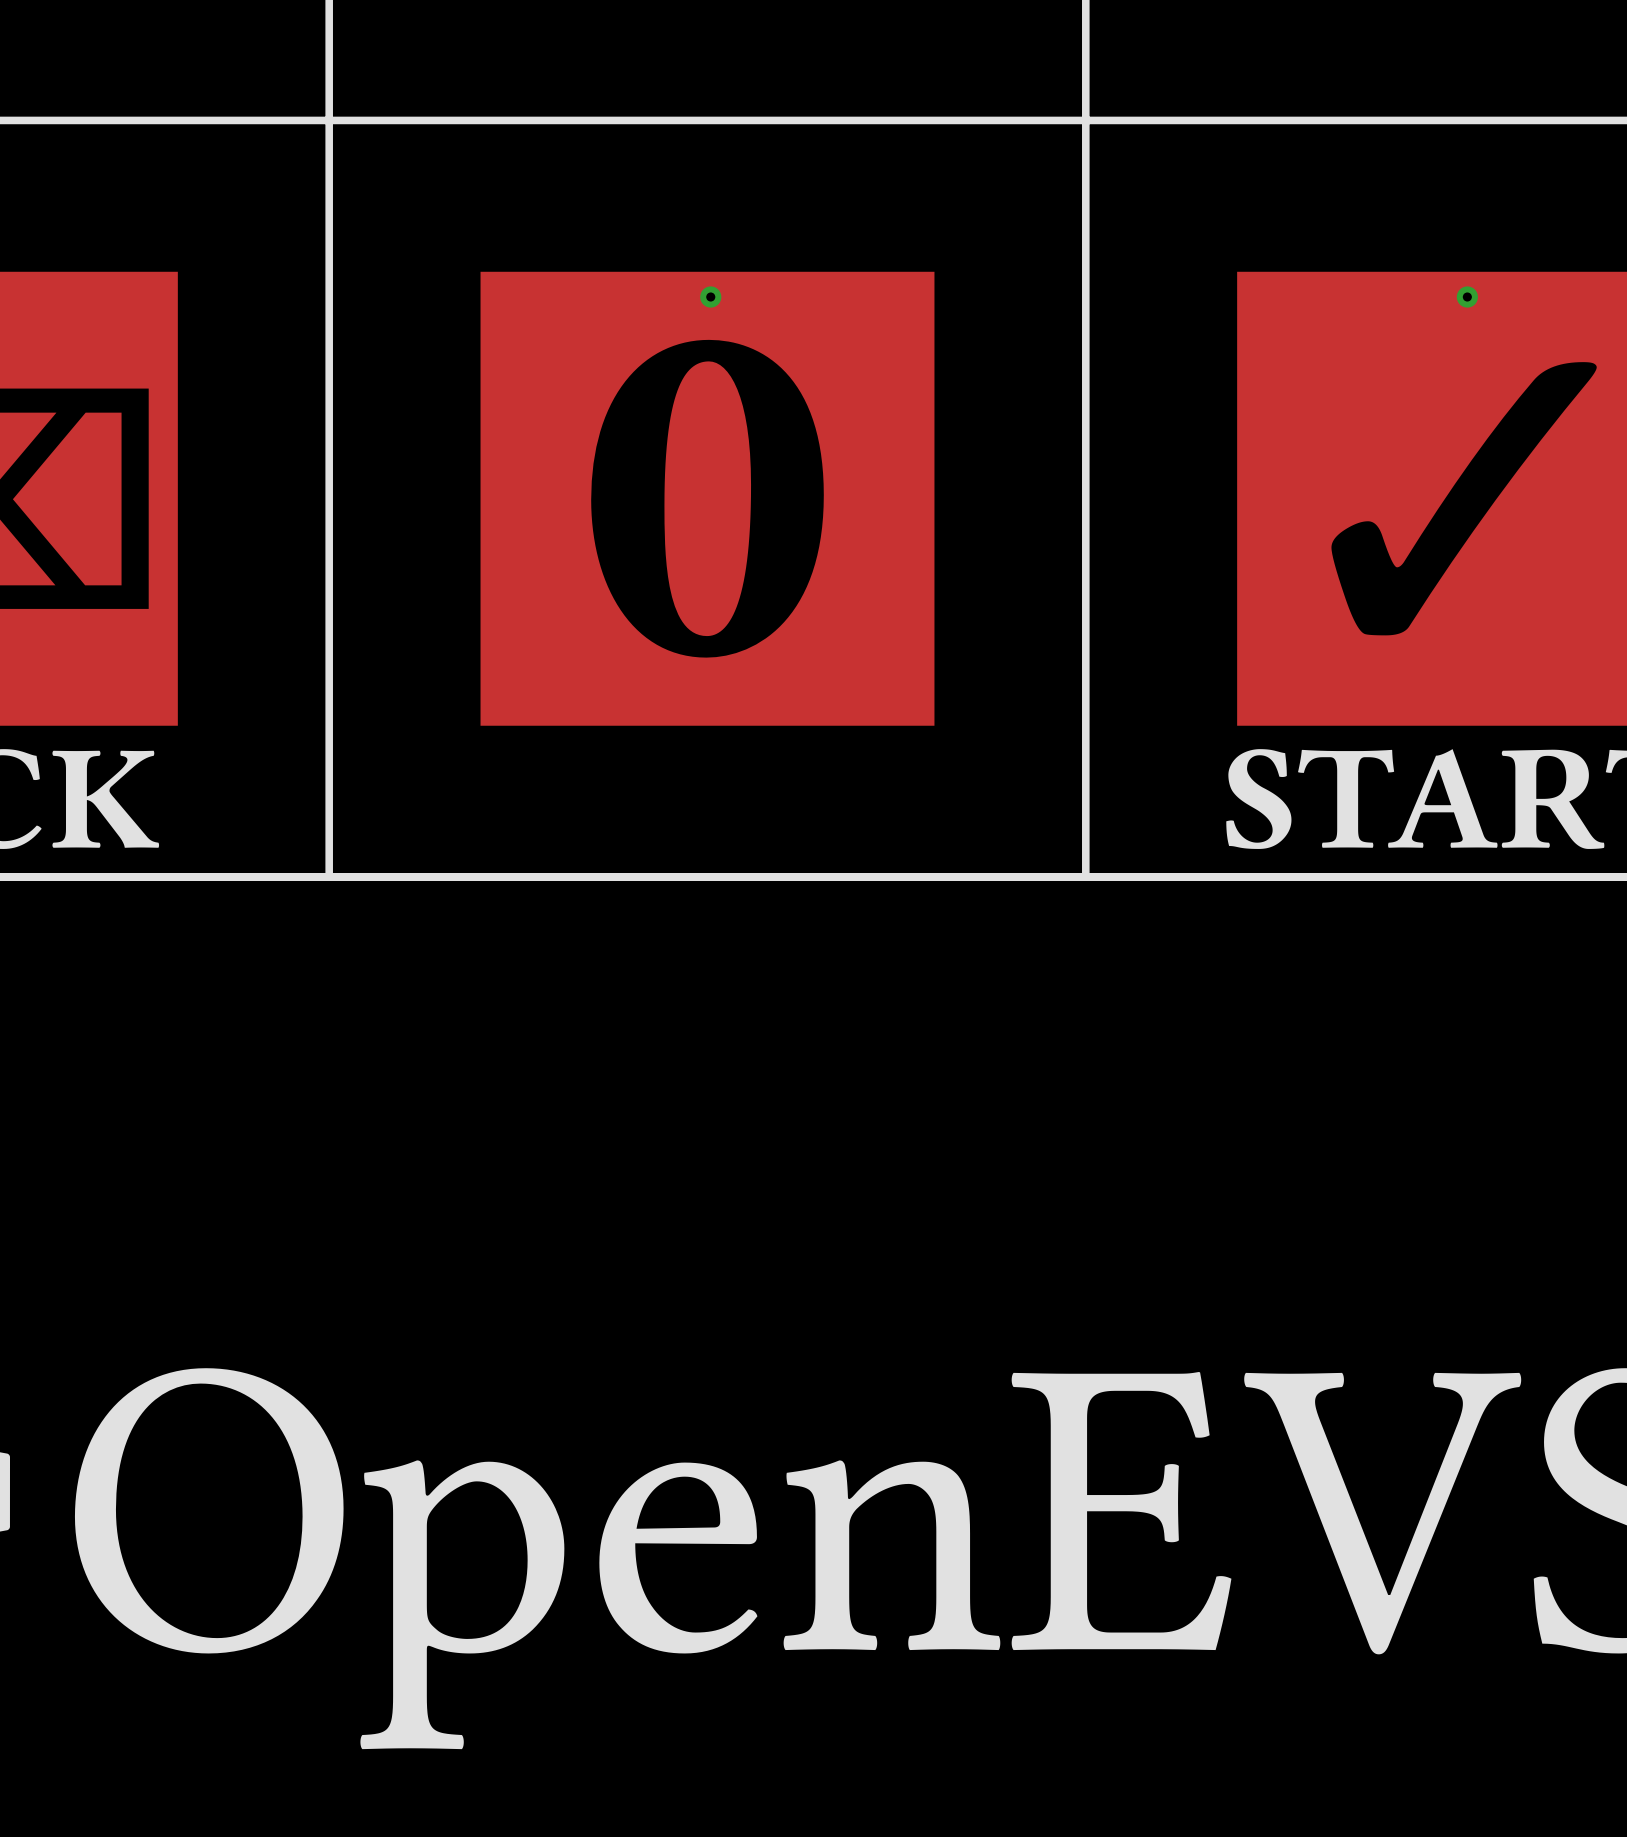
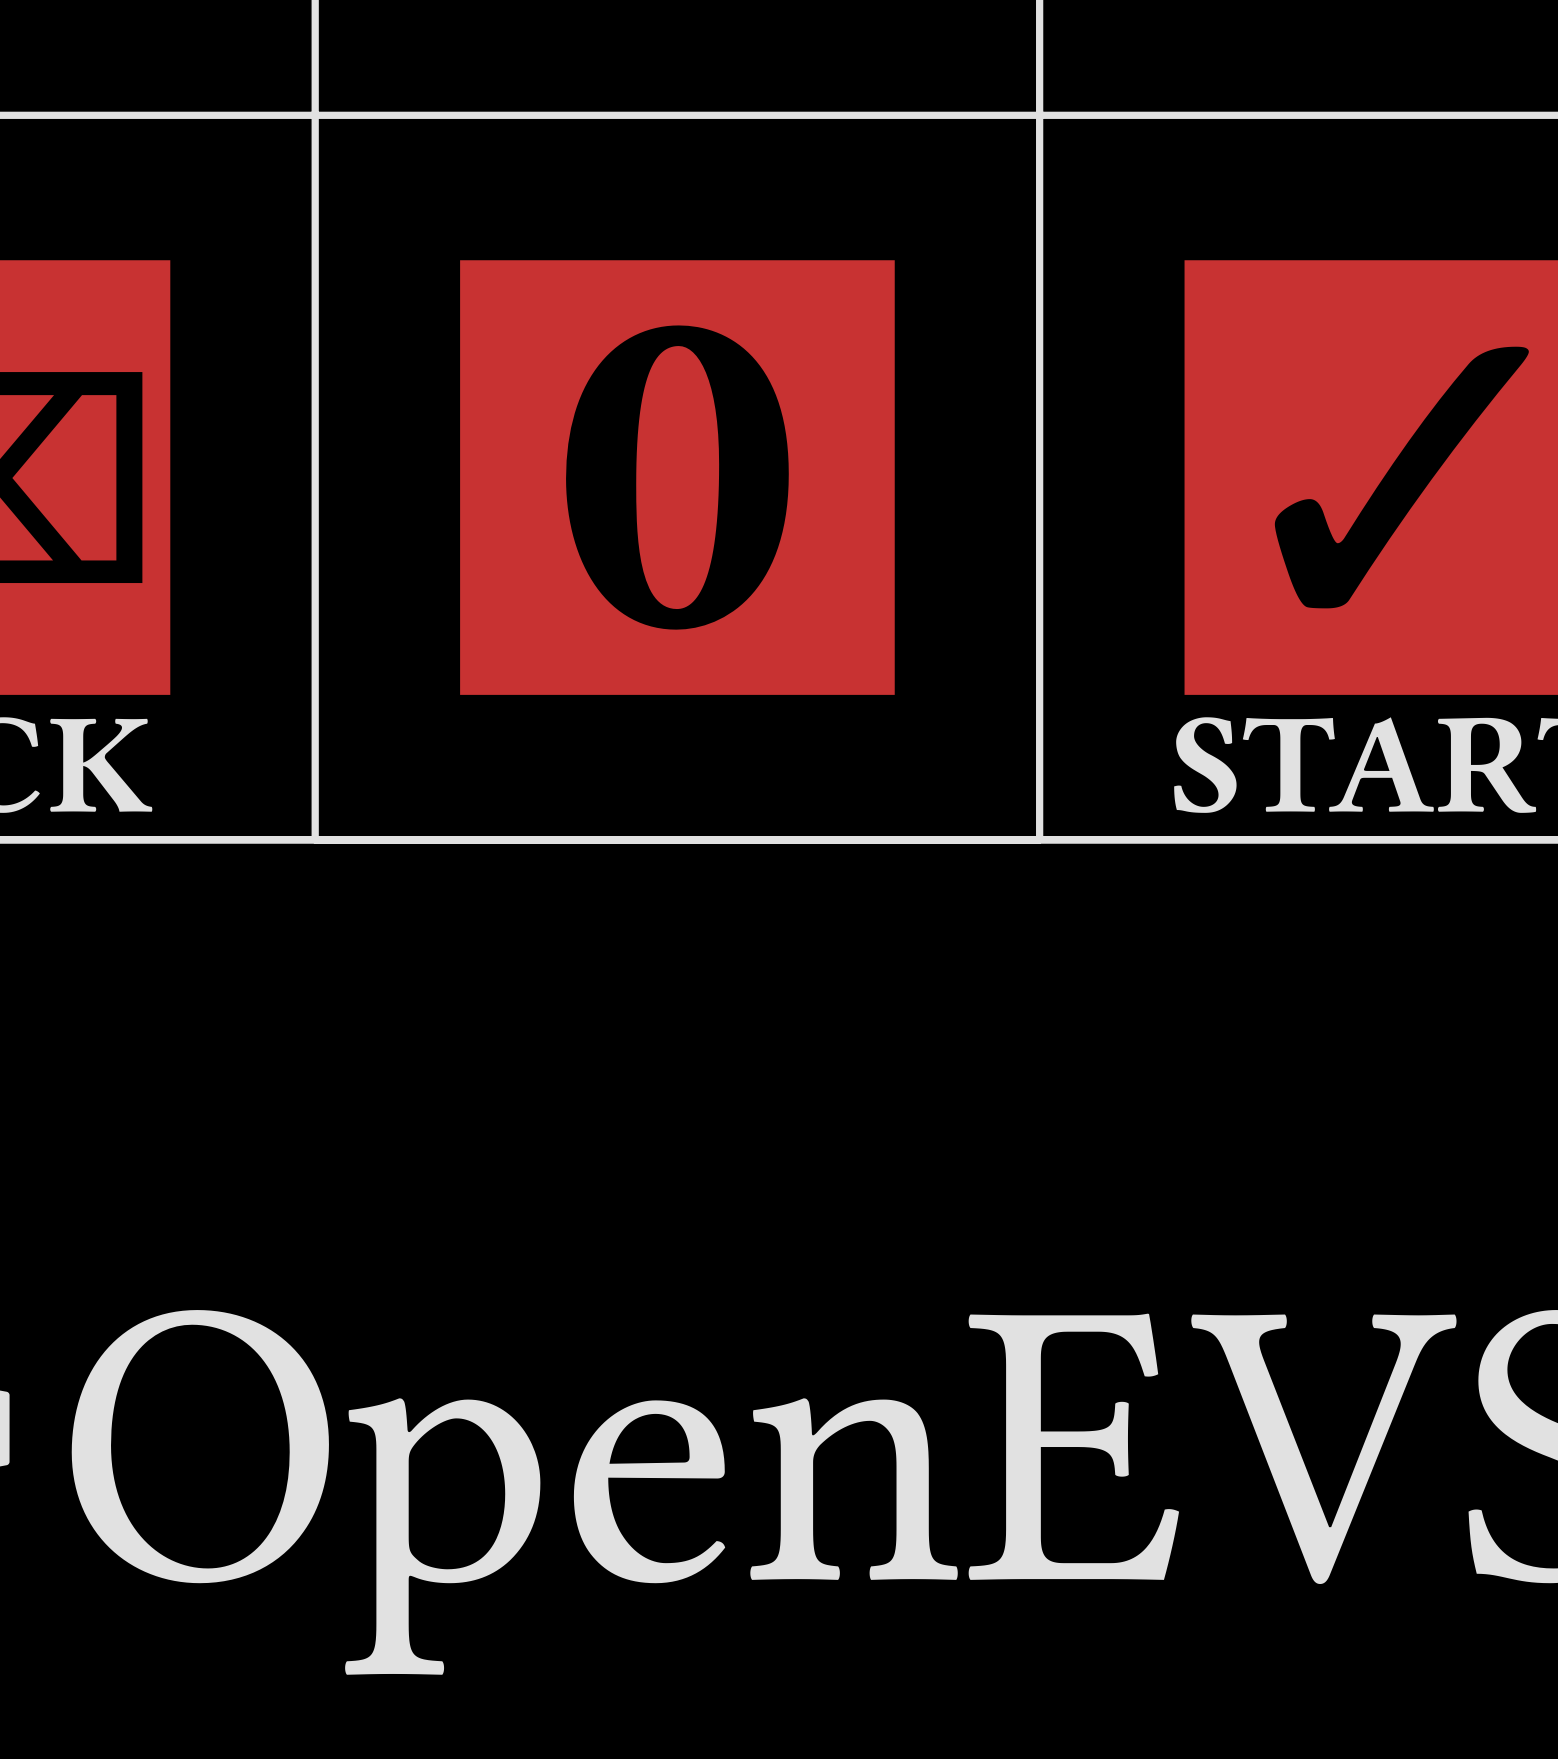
via: (710, 297) -> none
via: (1467, 297) -> none

